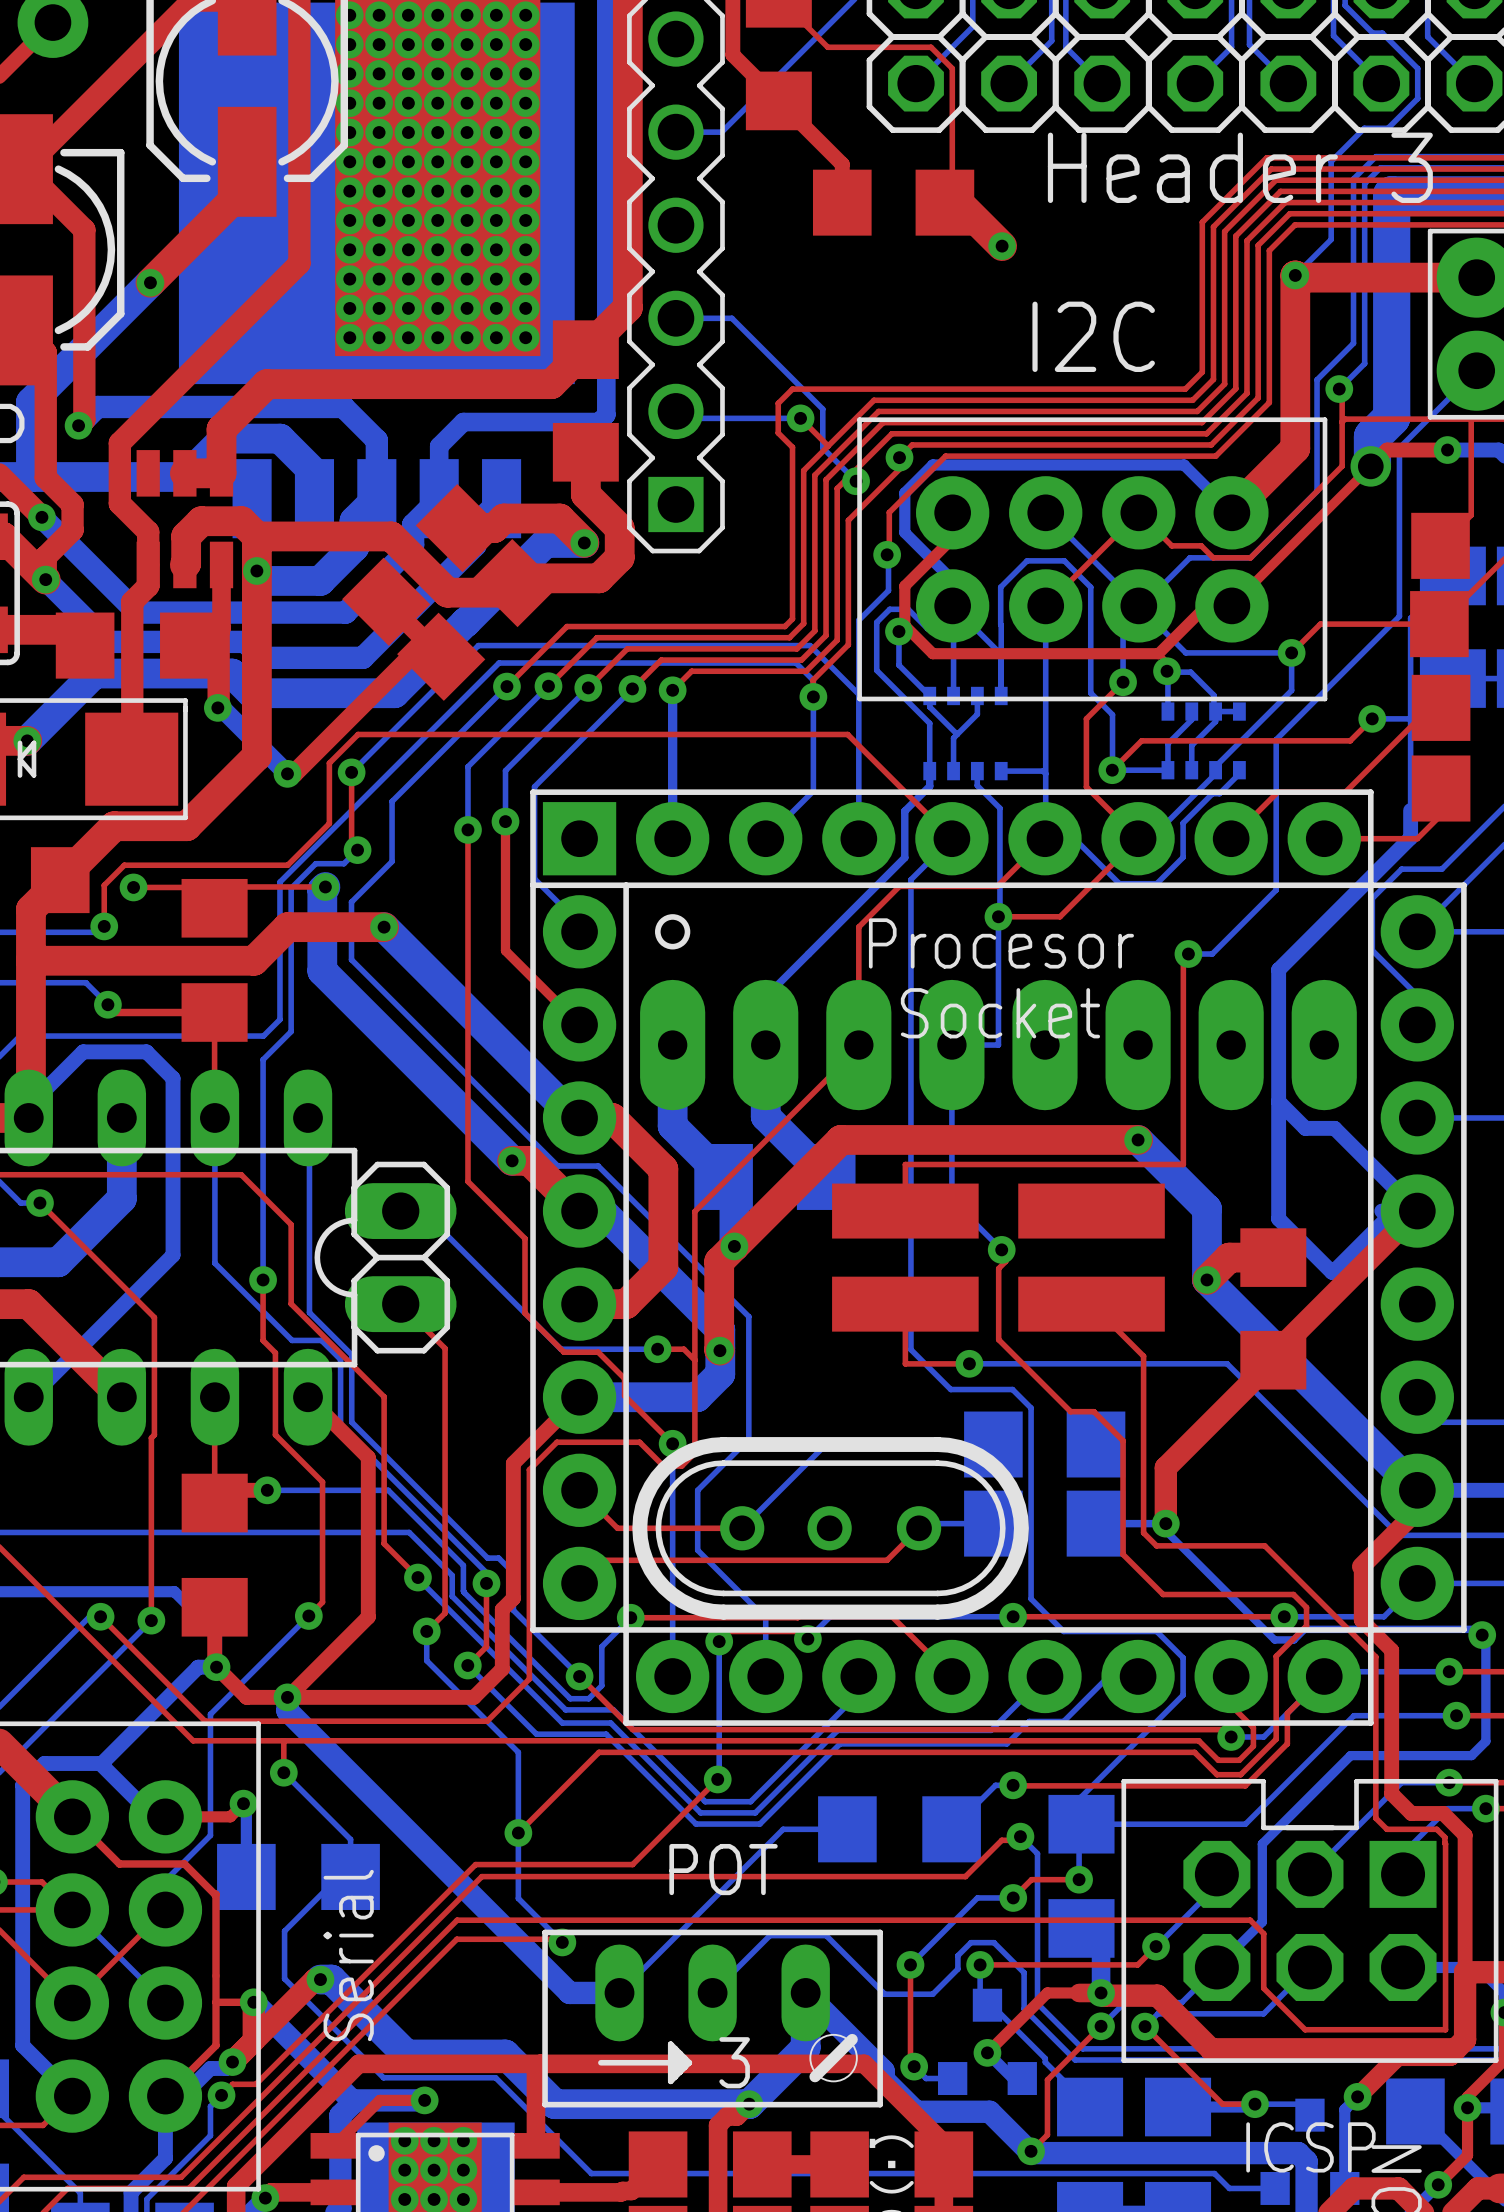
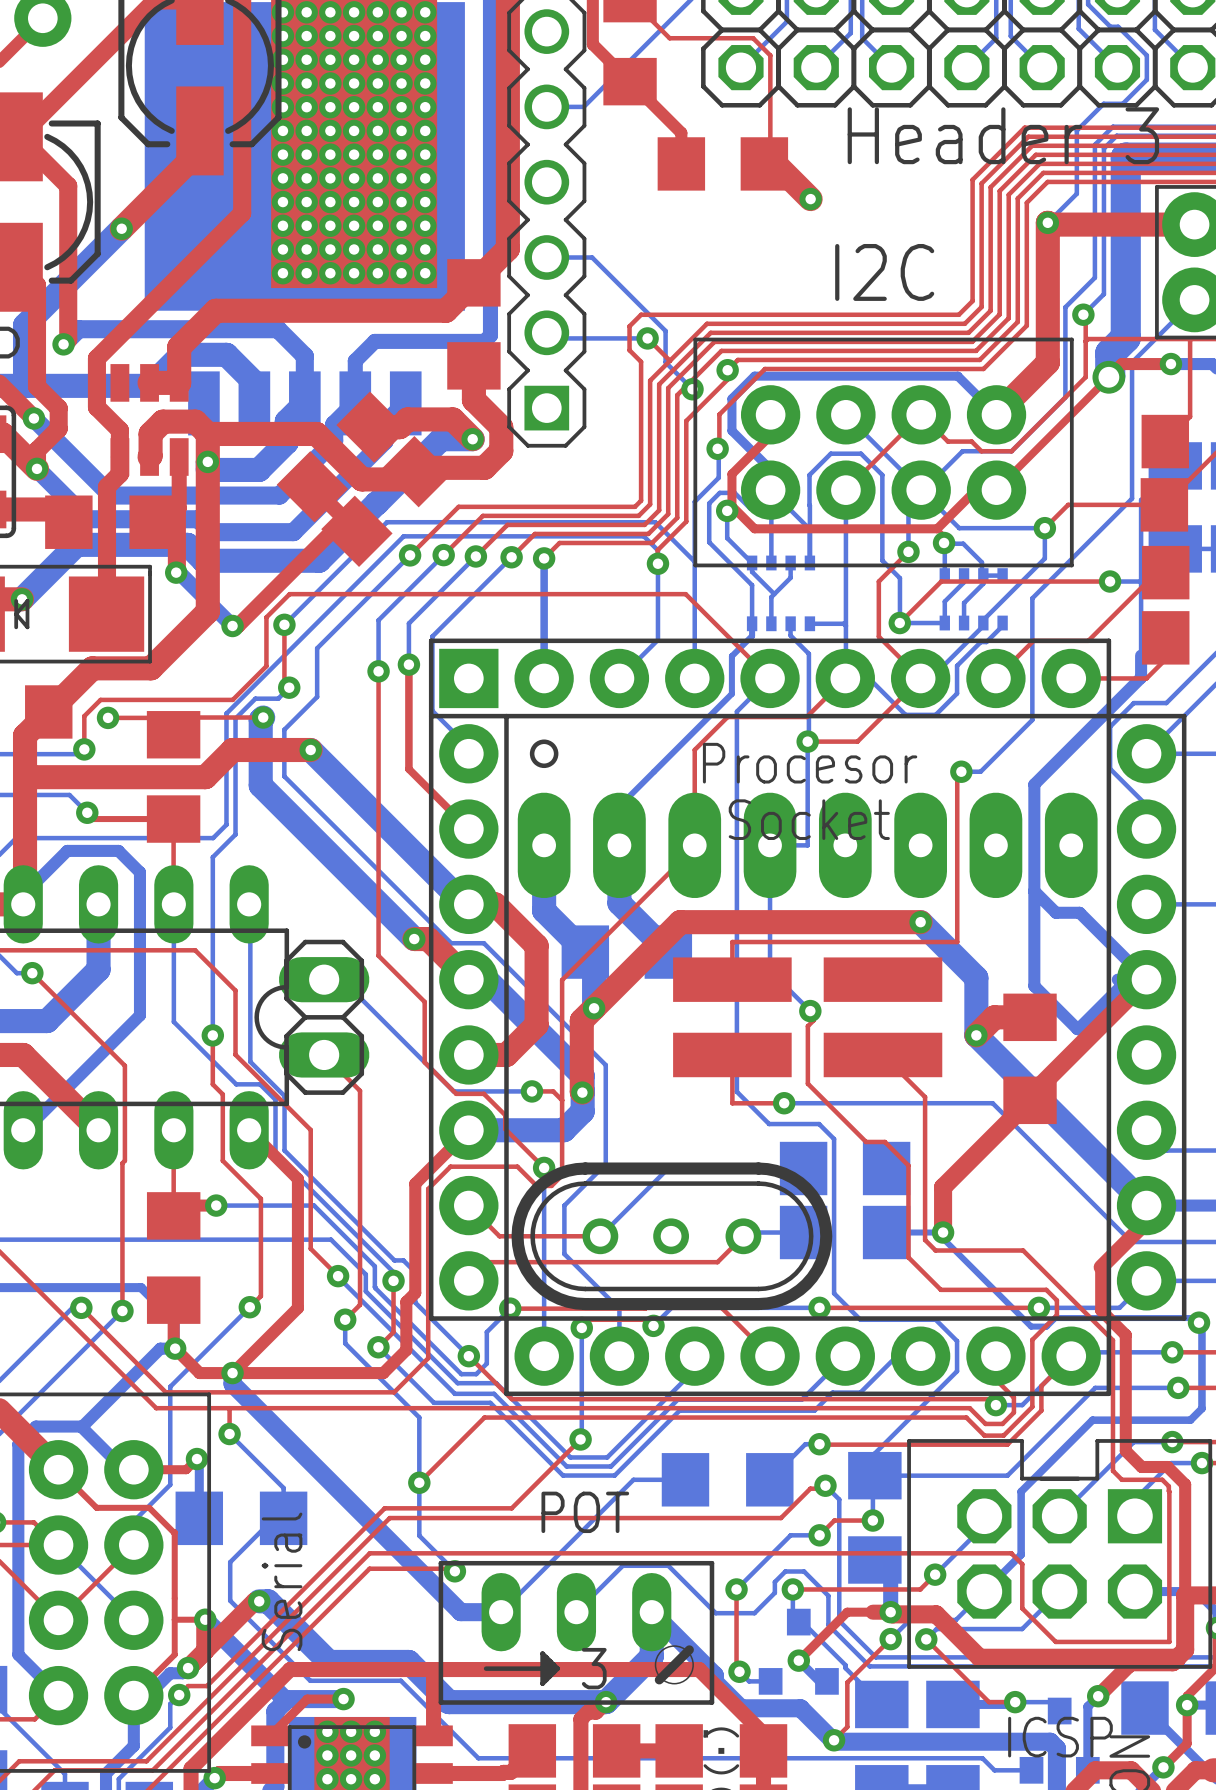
top track: (1372, 718) (1350, 740) (1141, 740) -> (1110, 581) (941, 581) (923, 599)

